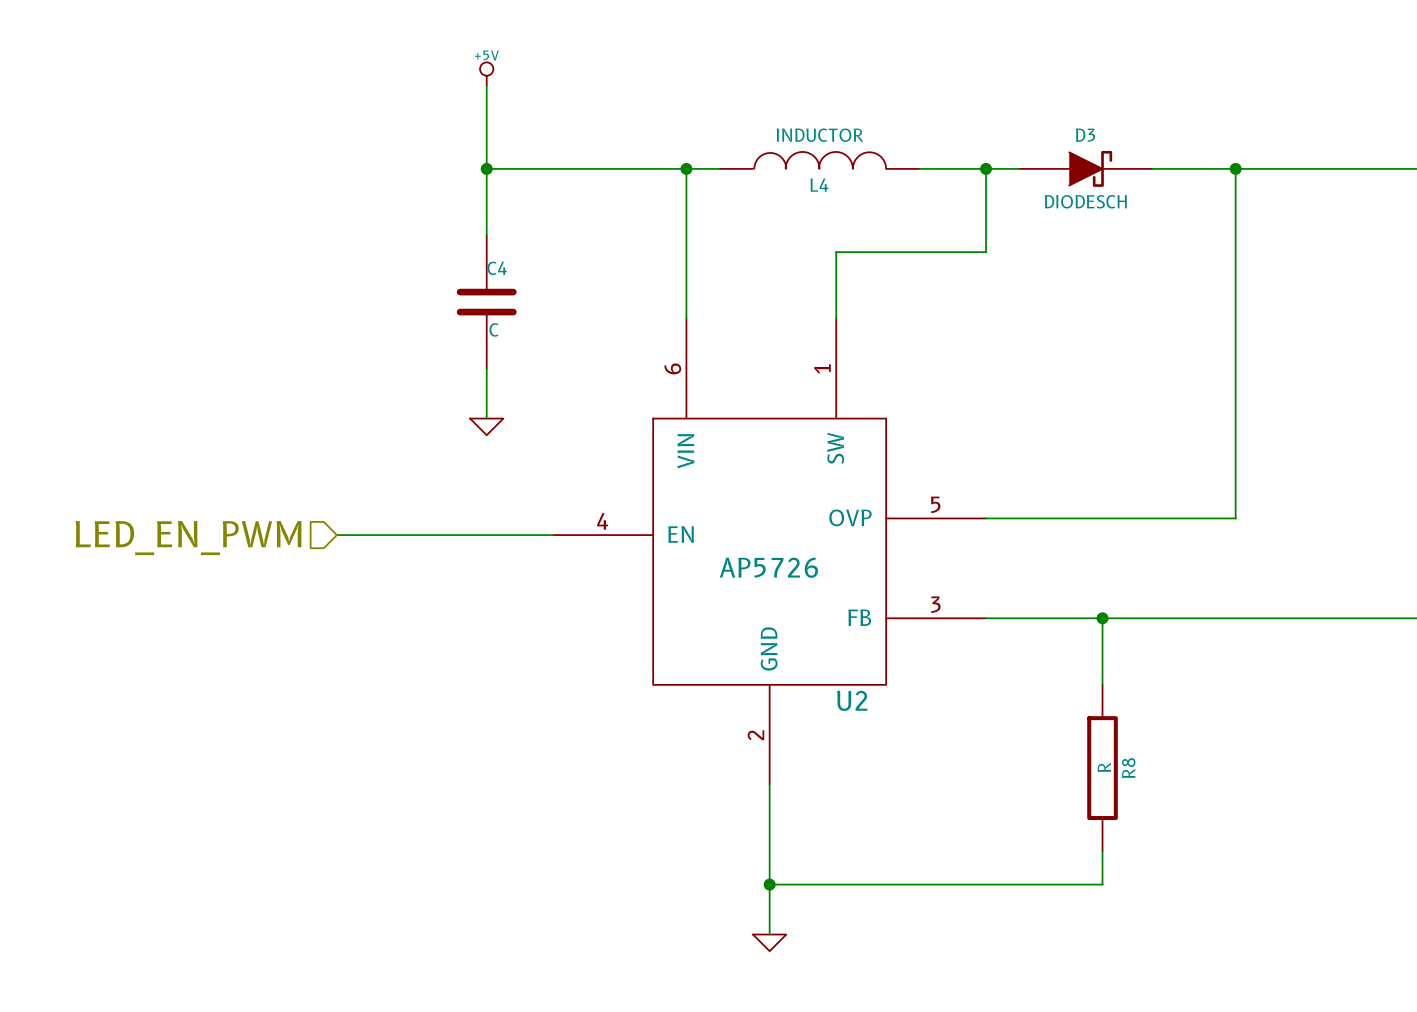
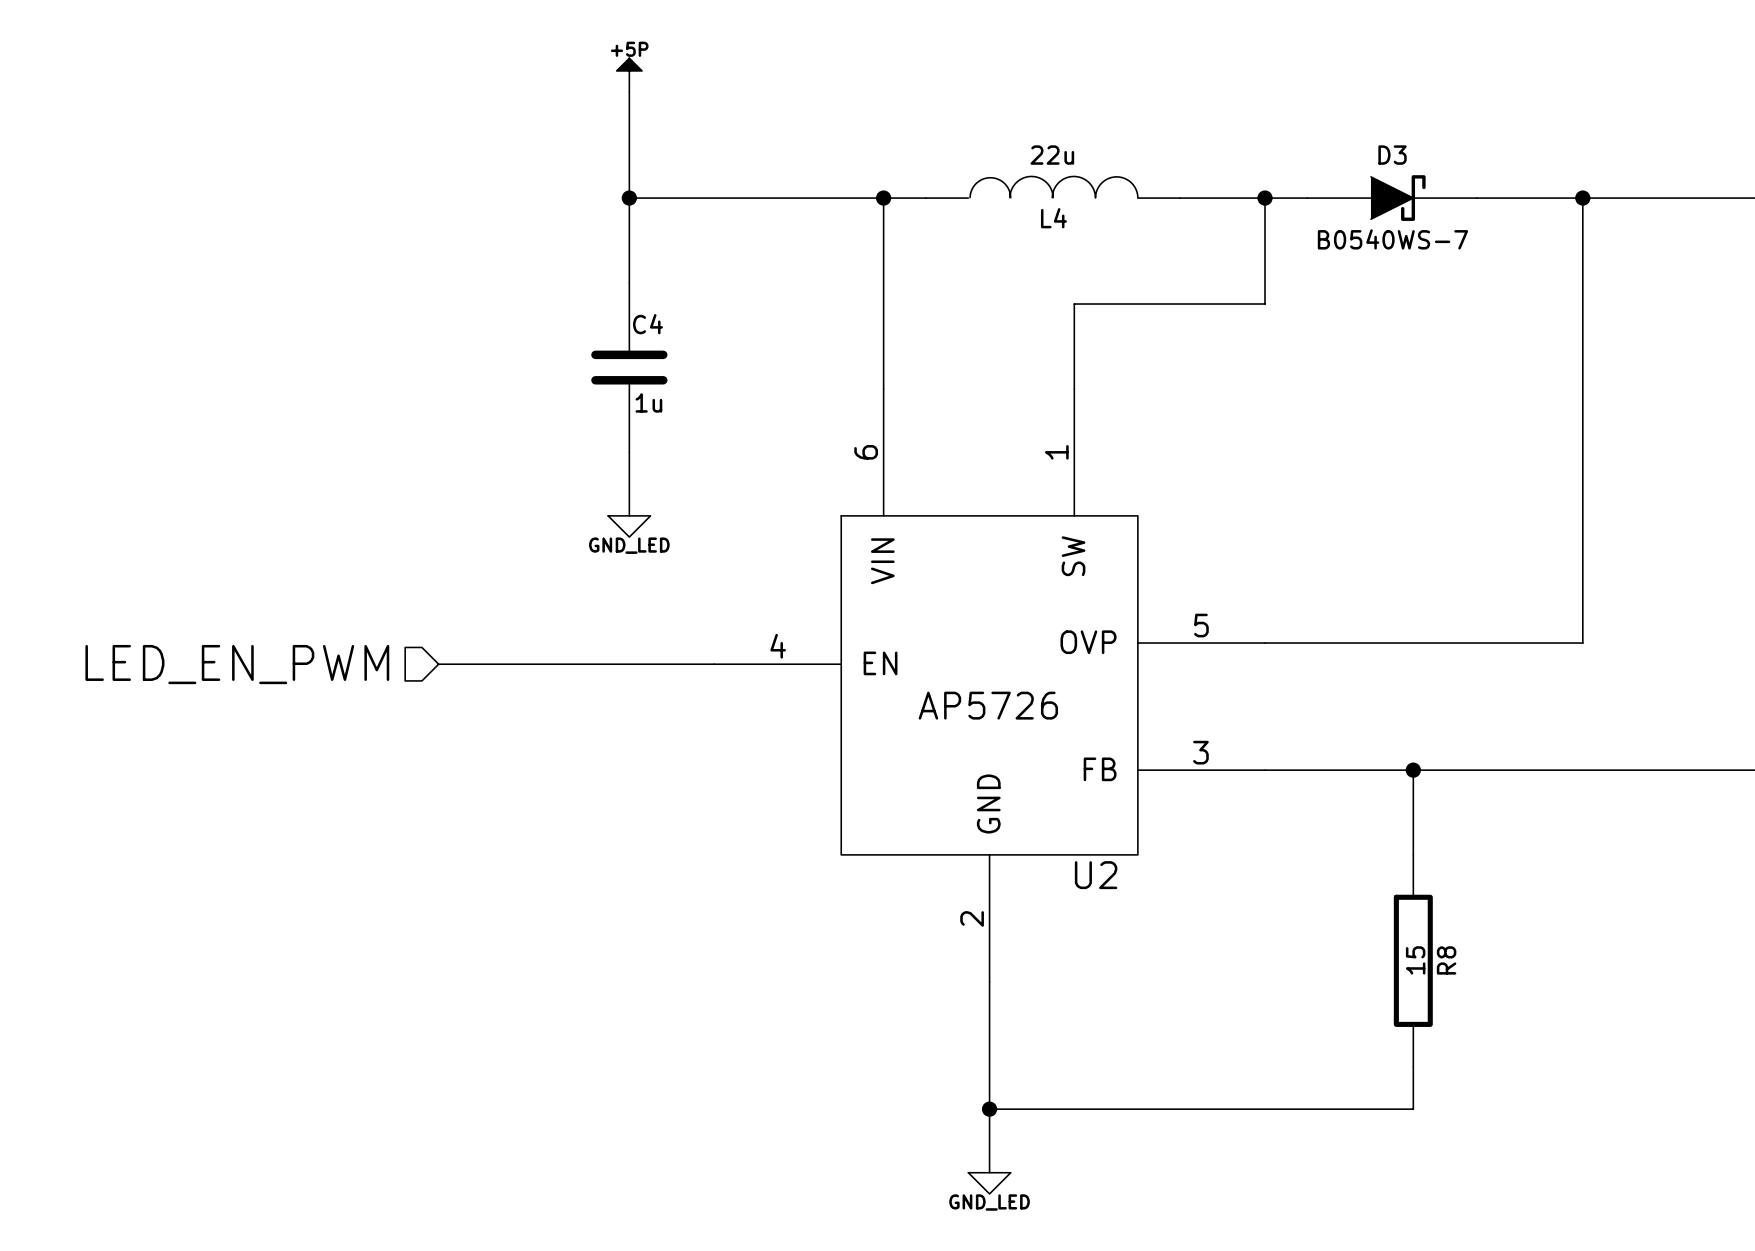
power symbol: +5V (486, 74) -> +5P (629, 75)
L4 value: INDUCTOR (819, 135) -> 22u (1052, 155)
D3 value: DIODESCH (1085, 201) -> B0540WS-7 (1392, 239)
C4 value: C (494, 329) -> 1u (648, 402)
power symbol text: none -> GND_LED (629, 545)
R8 value: R (1104, 767) -> 15 (1415, 960)
power symbol text: none -> GND_LED (989, 1202)

